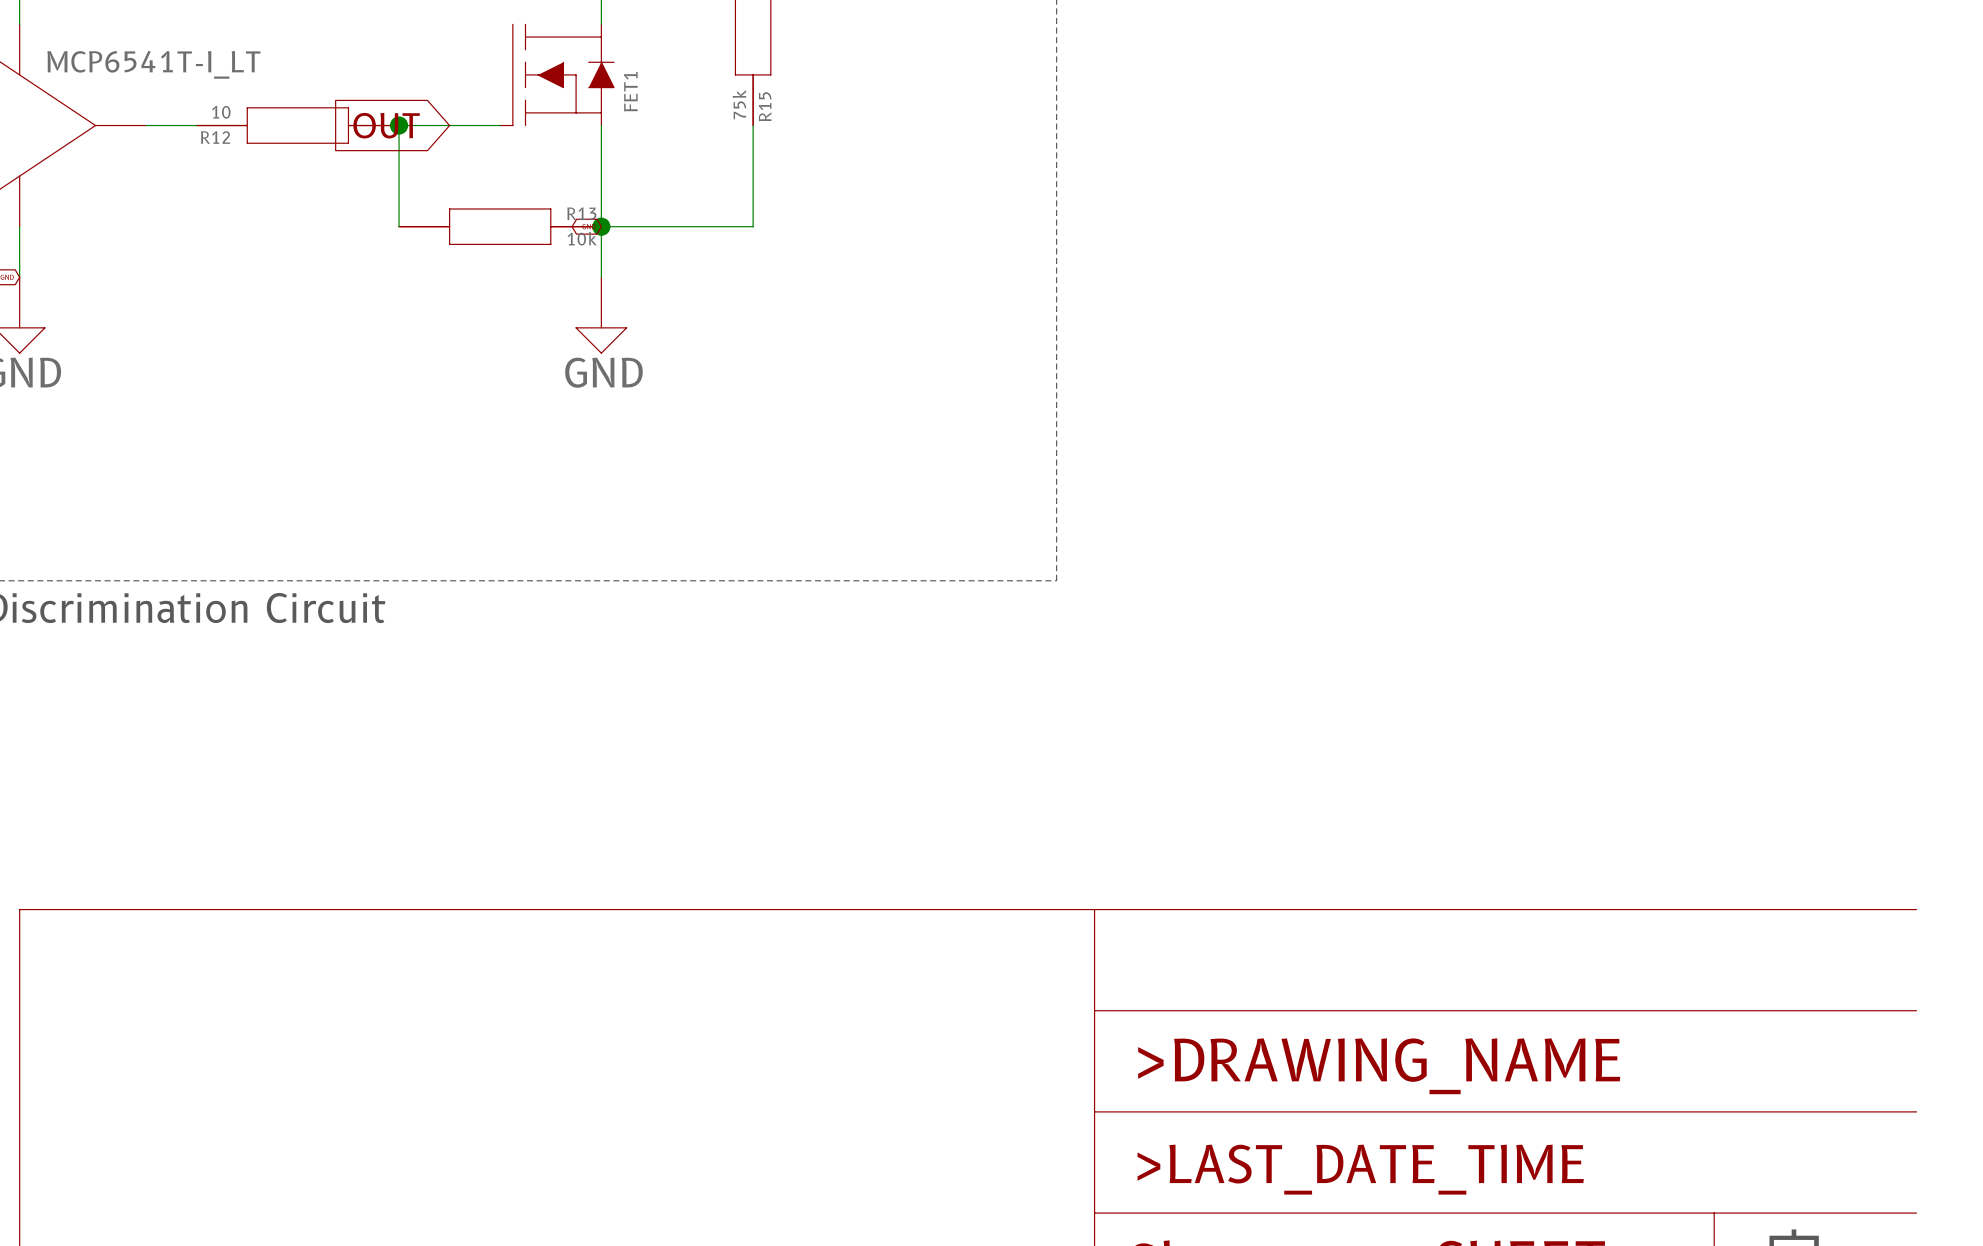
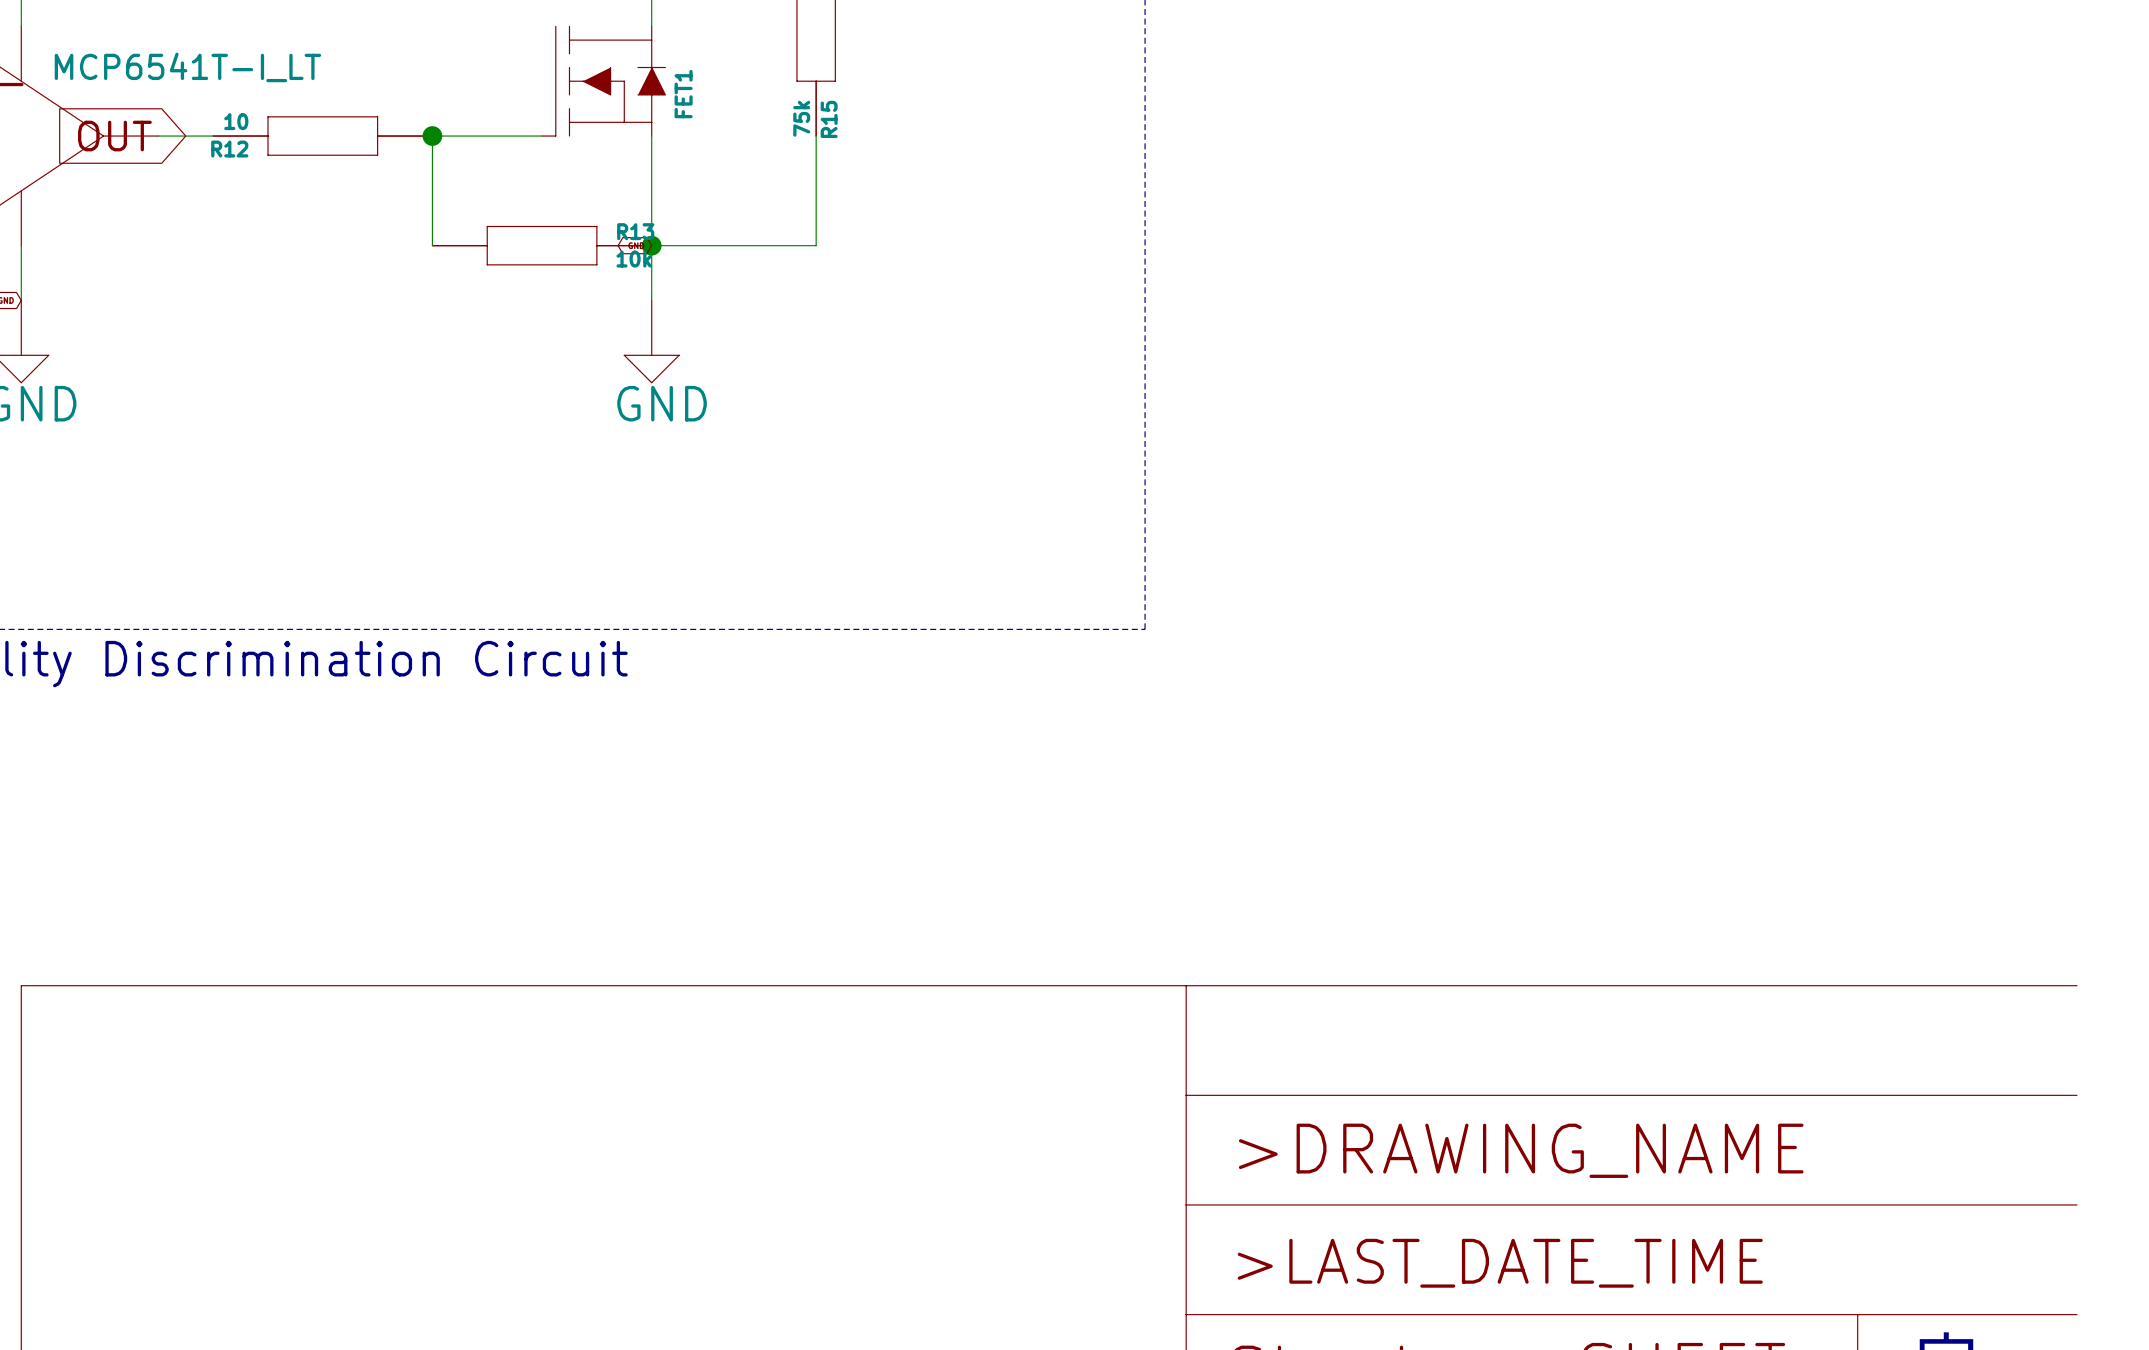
global label position: OUT (386, 125) -> OUT (114, 136)

